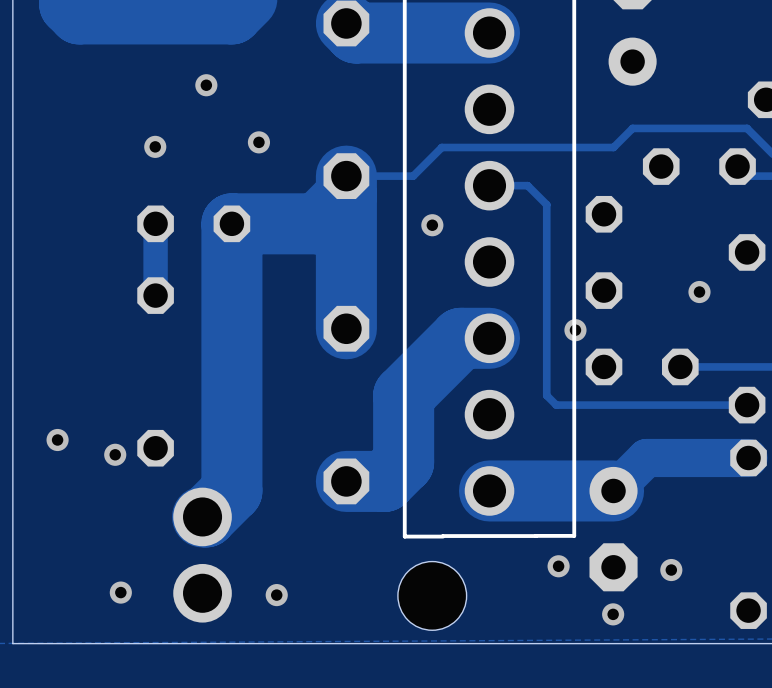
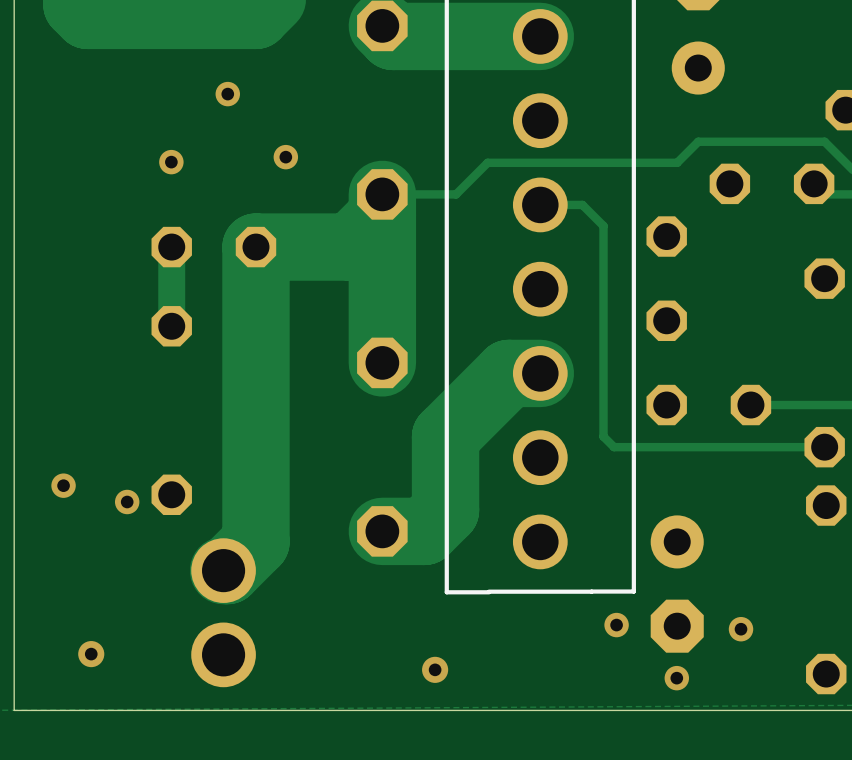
via: (432, 225) -> none
via: (699, 292) -> none
via: (575, 330) -> none
track: (748, 457) (646, 457) (613, 490) (489, 490) -> none
via: none -> (91, 654)
via: (120, 592) -> none
via: (276, 595) -> none
hole: (432, 595) -> none
via: none -> (435, 669)

